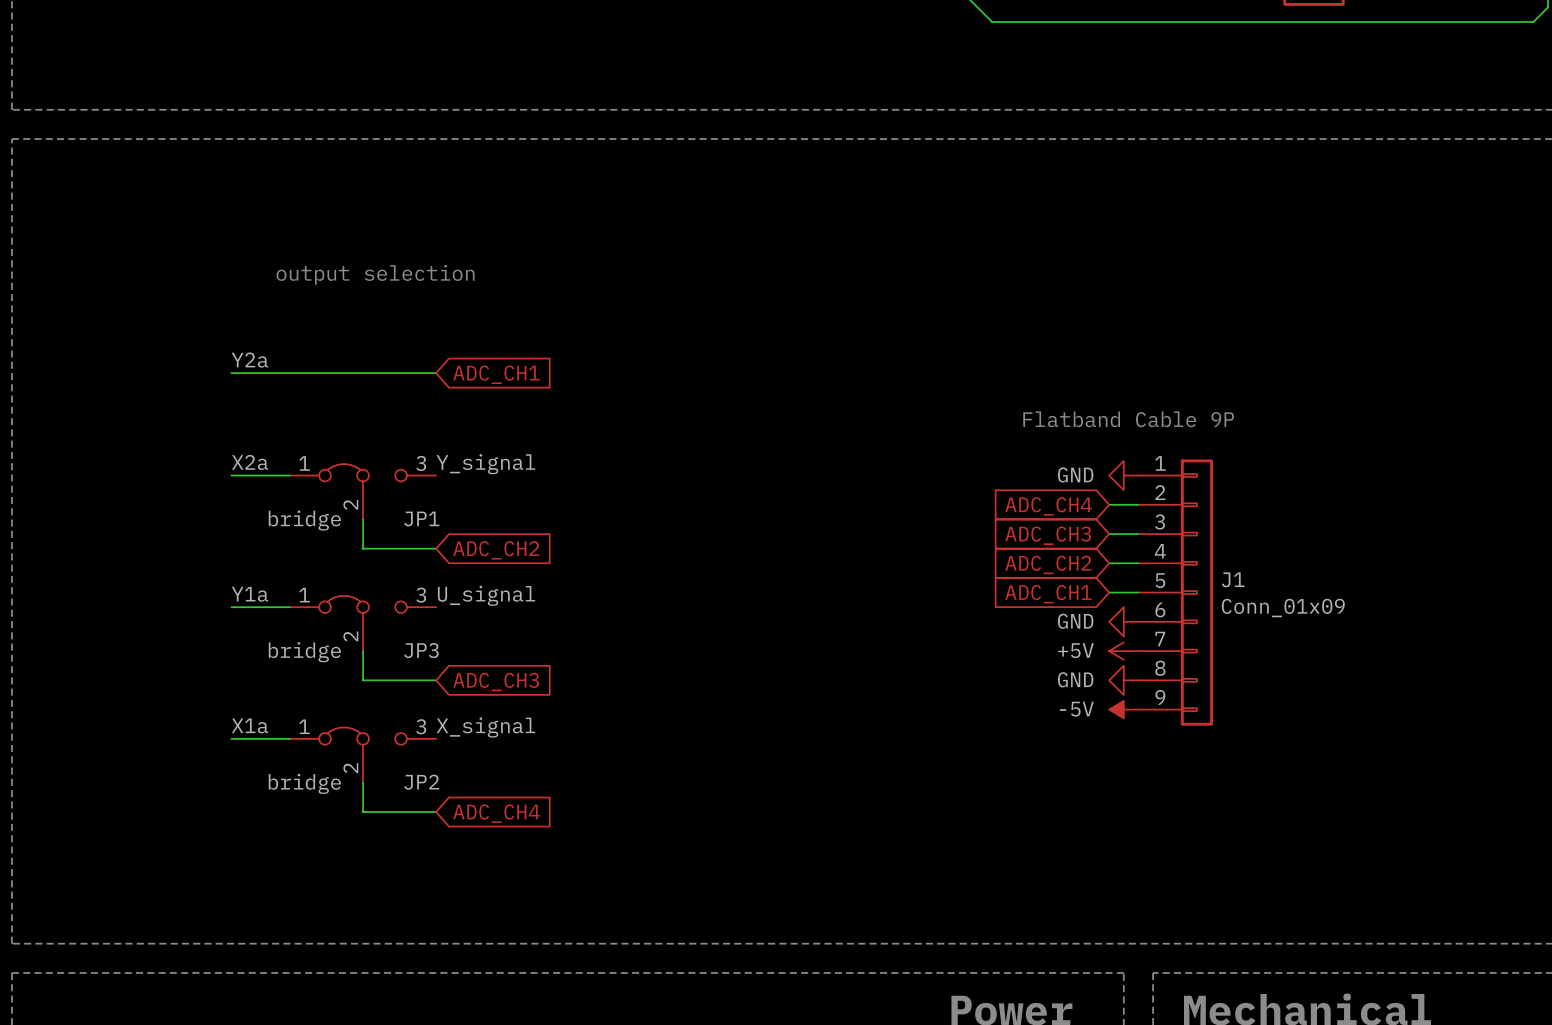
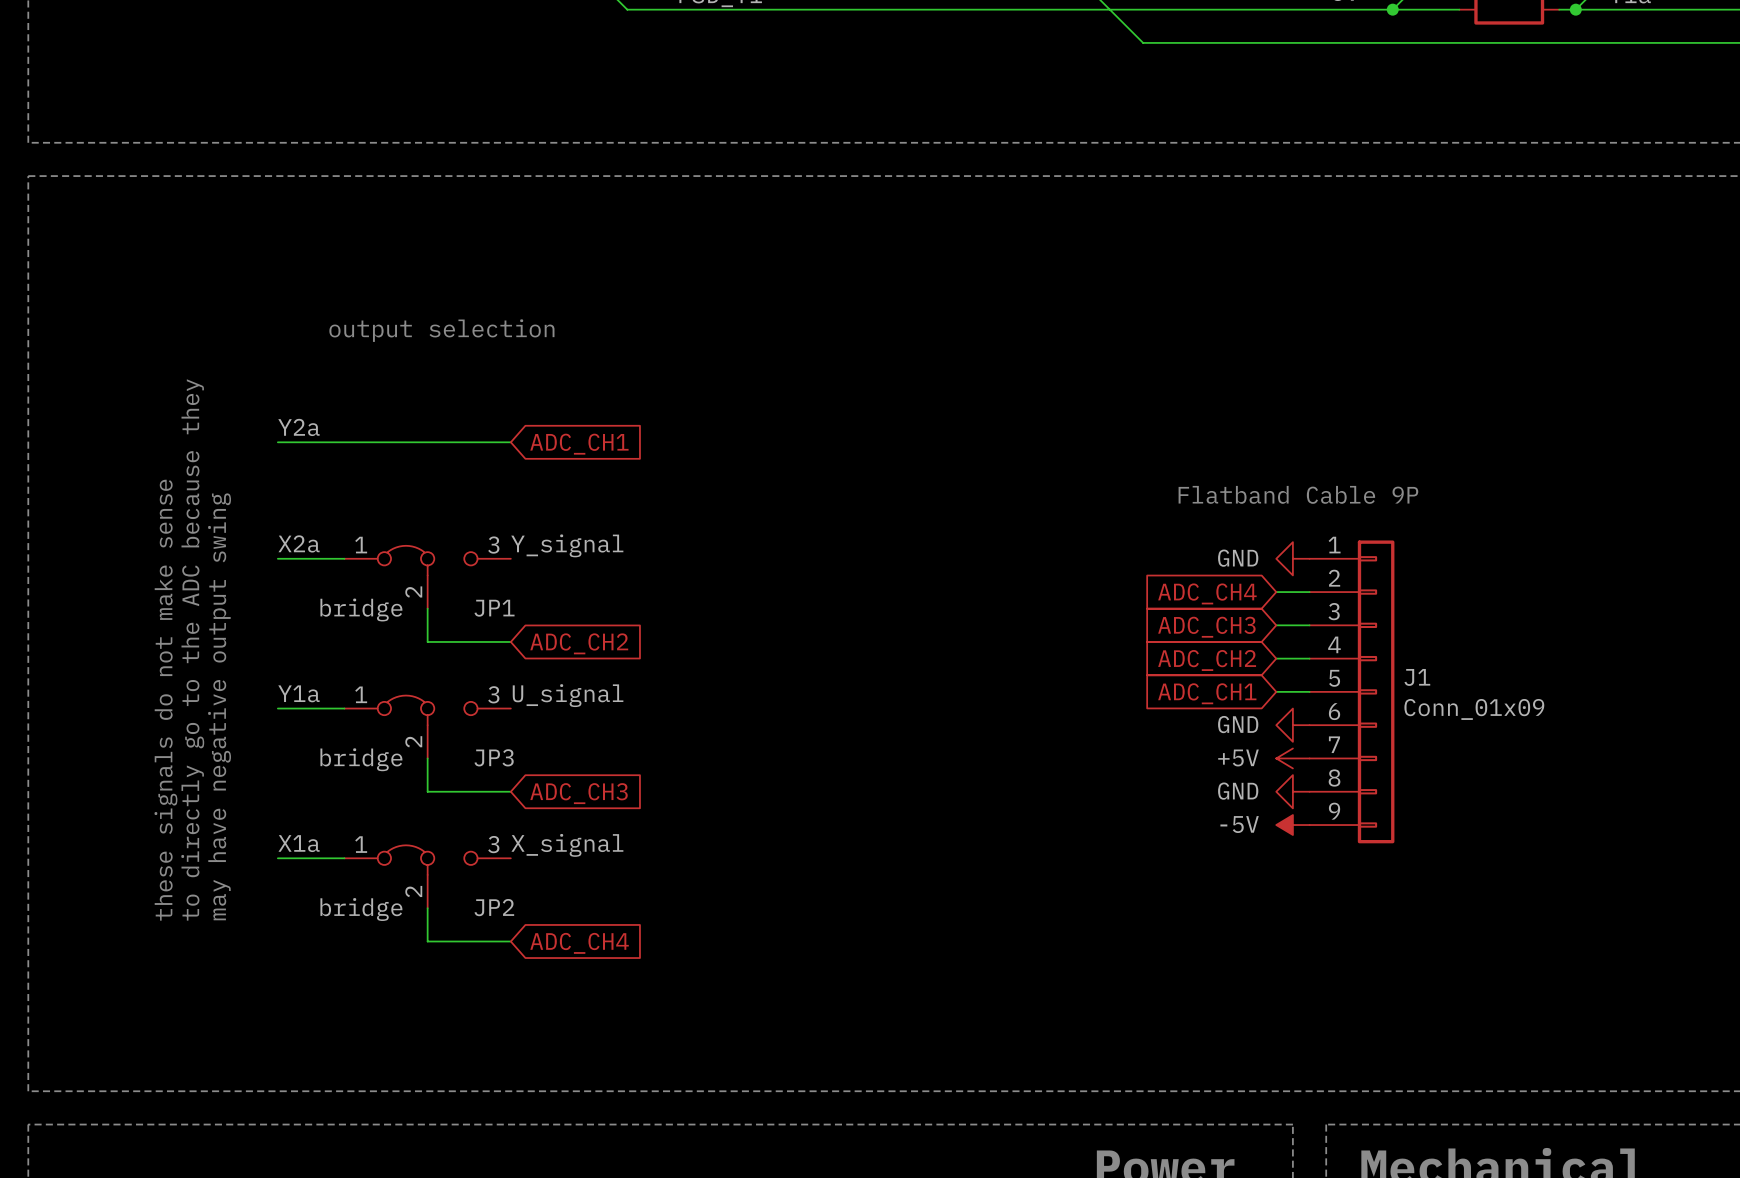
text: none -> to directly go to the ADC because they (192, 649)
text: none -> these signals do not make sense (165, 700)
text: none -> may have negative output swing (219, 706)

